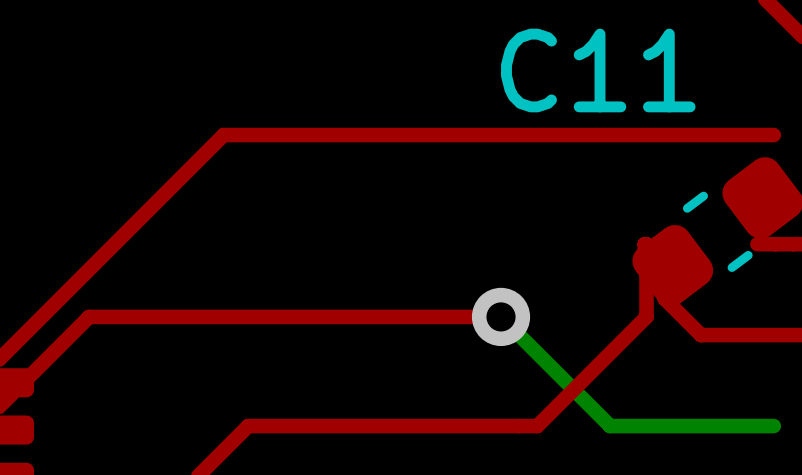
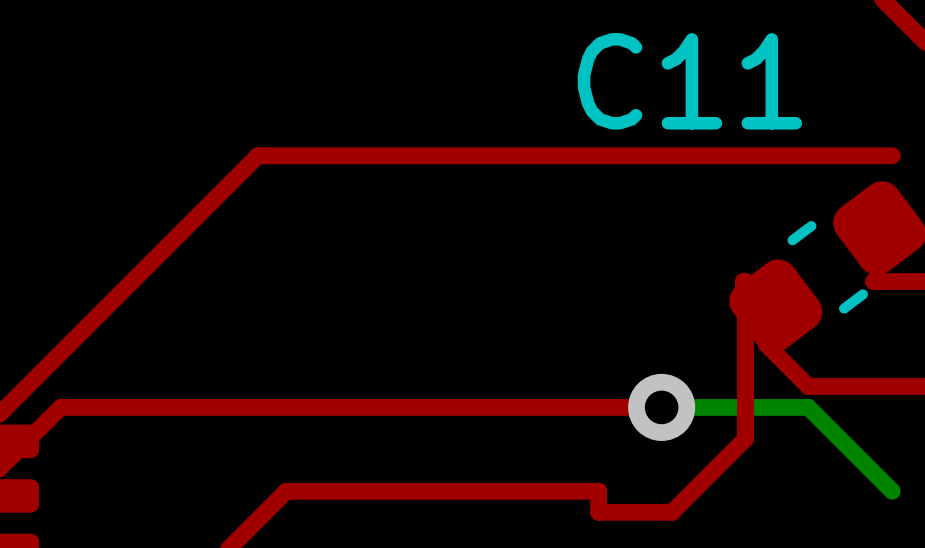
top track: (501, 316) (89, 316) (52, 353) -> (661, 407) (60, 407)
bottom track: (501, 316) (610, 426) (773, 426) -> (661, 407) (808, 407) (892, 491)
via position: (501, 316) -> (661, 407)
top track: (646, 316) (537, 426) (519, 426) -> (745, 365) (745, 438) (672, 512) (598, 512) (598, 491)

